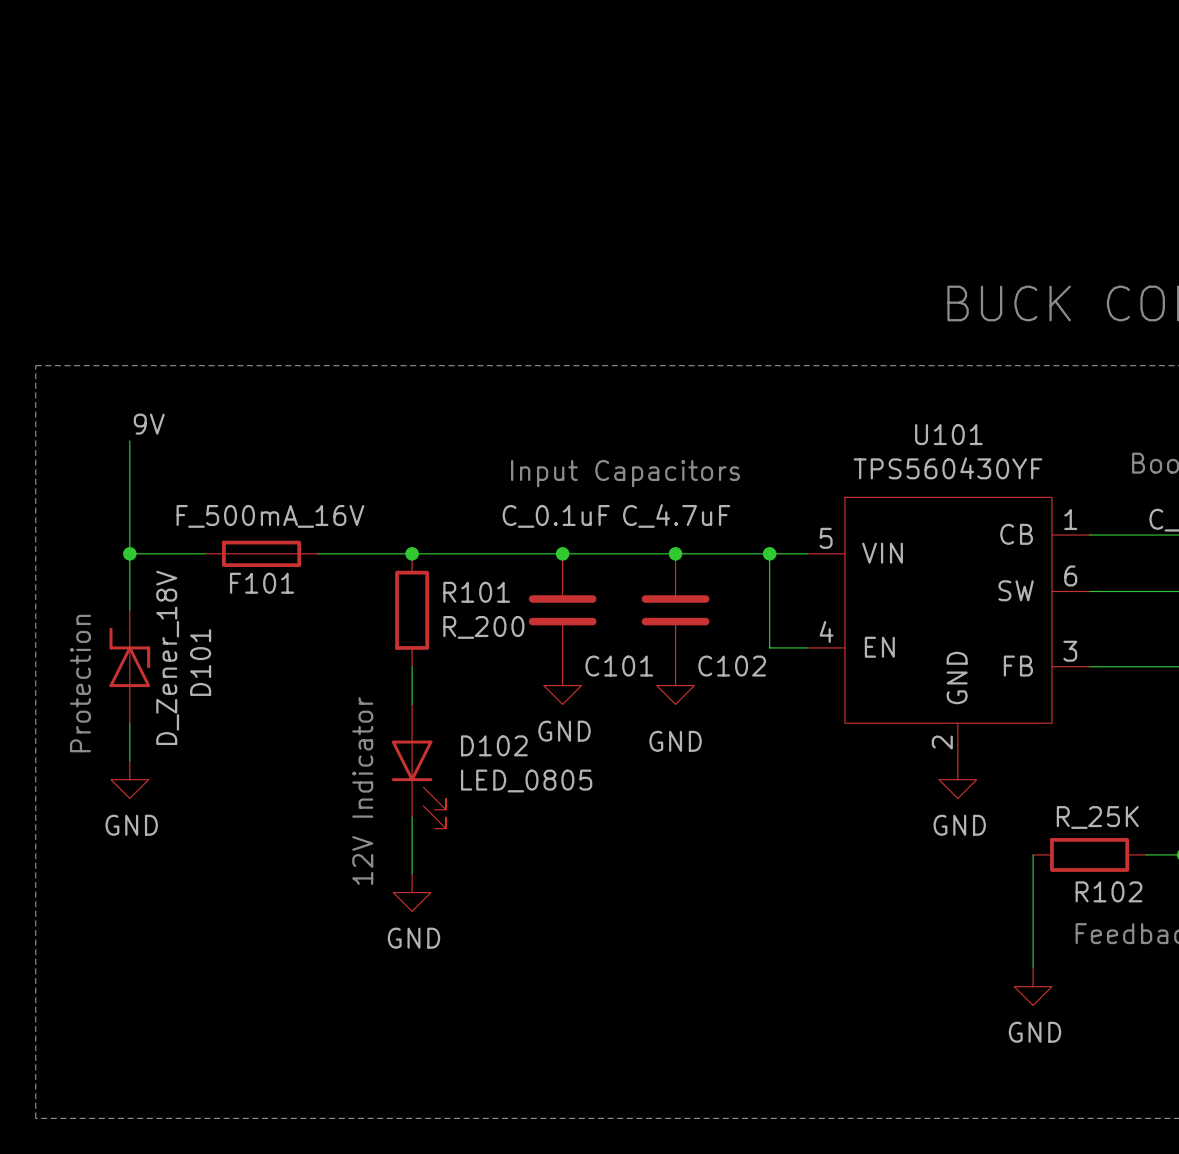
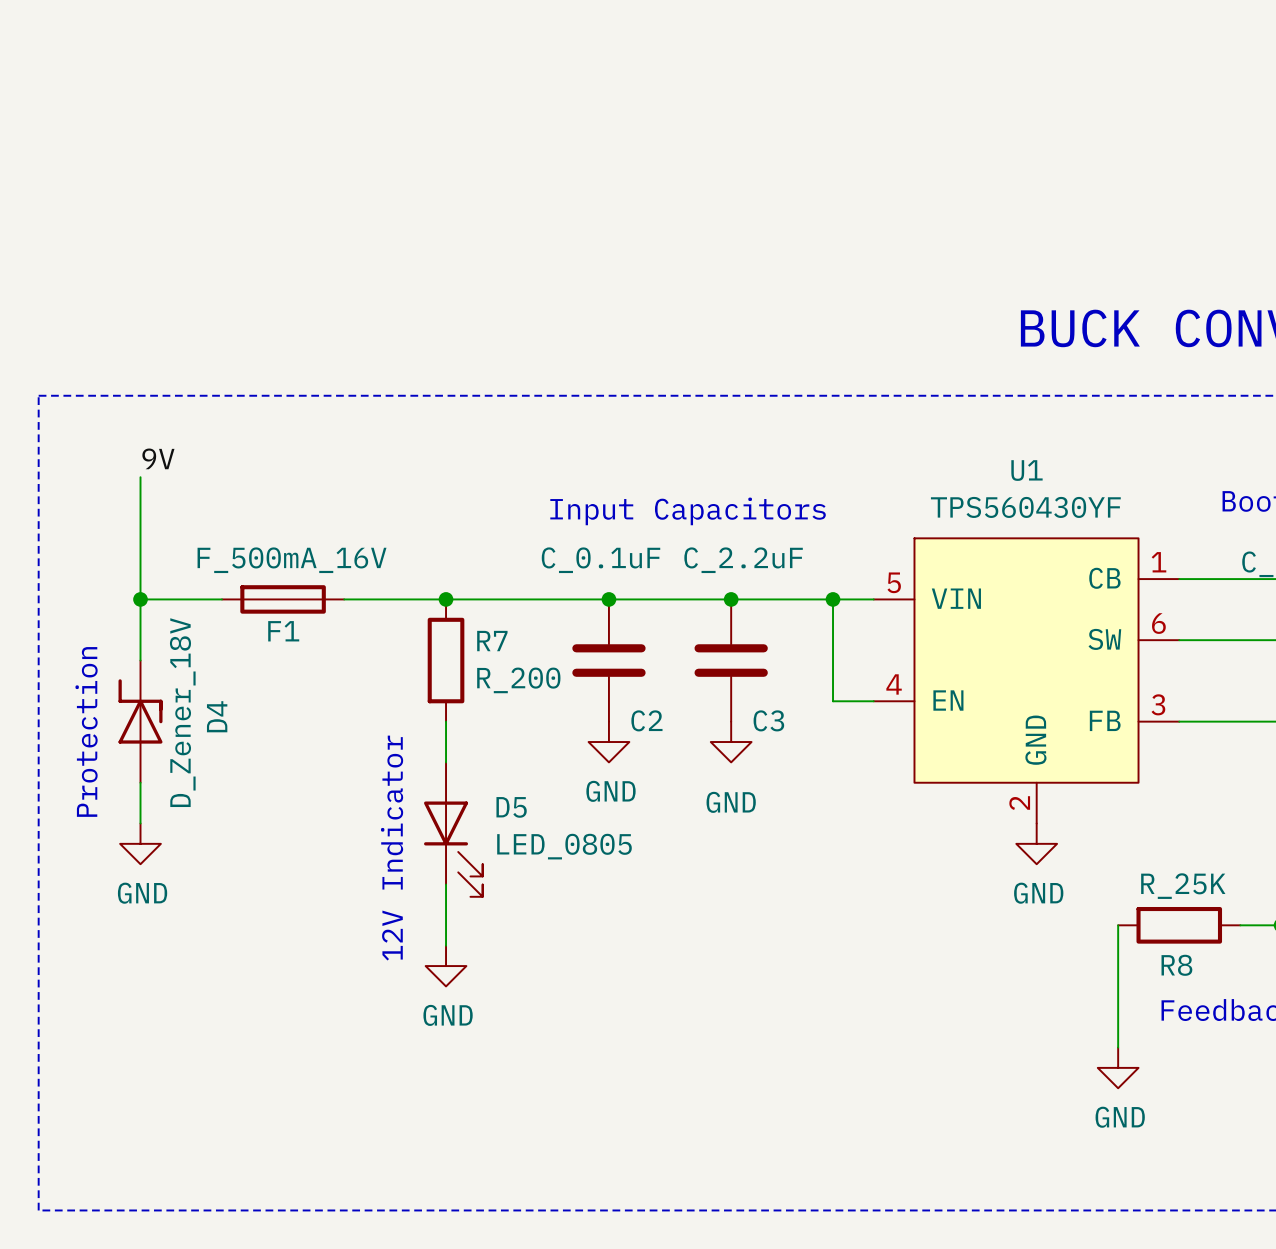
U101 name: U101 (948, 434) -> U1 (1026, 470)
C102 value: C_4.7uF (676, 515) -> C_2.2uF (743, 560)
F101 name: F101 (262, 583) -> F1 (283, 631)
R101 name: R101 (476, 592) -> R7 (492, 641)
D101 name: D101 (200, 662) -> D4 (217, 716)
C101 name: C101 (619, 666) -> C2 (646, 720)
C102 name: C102 (732, 666) -> C3 (768, 720)
D102 name: D102 (494, 745) -> D5 (511, 807)
R102 name: R102 (1108, 891) -> R8 (1176, 965)

